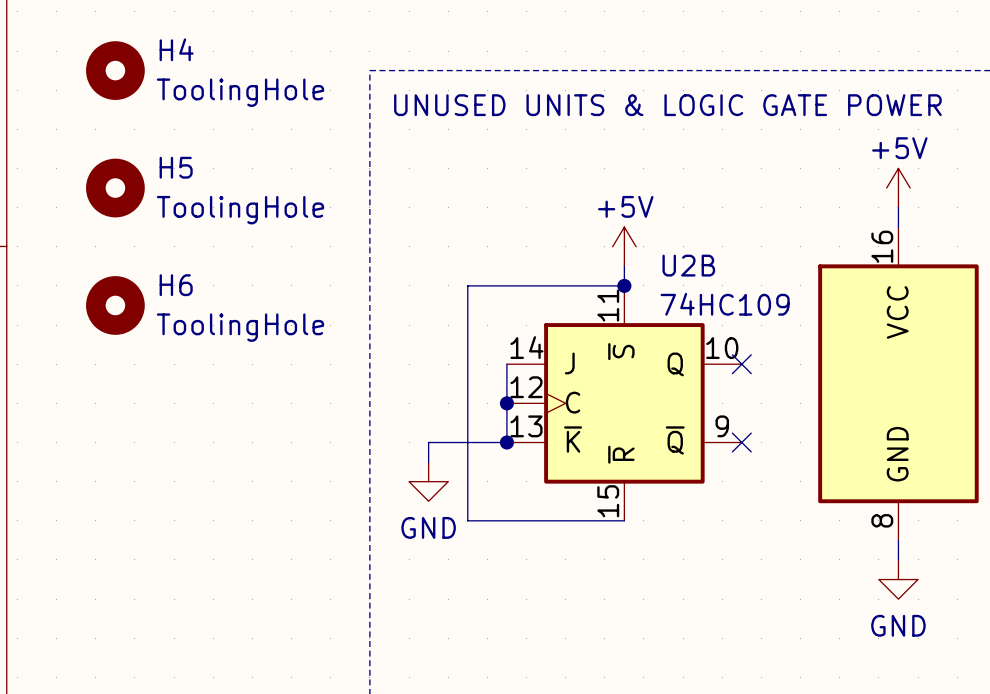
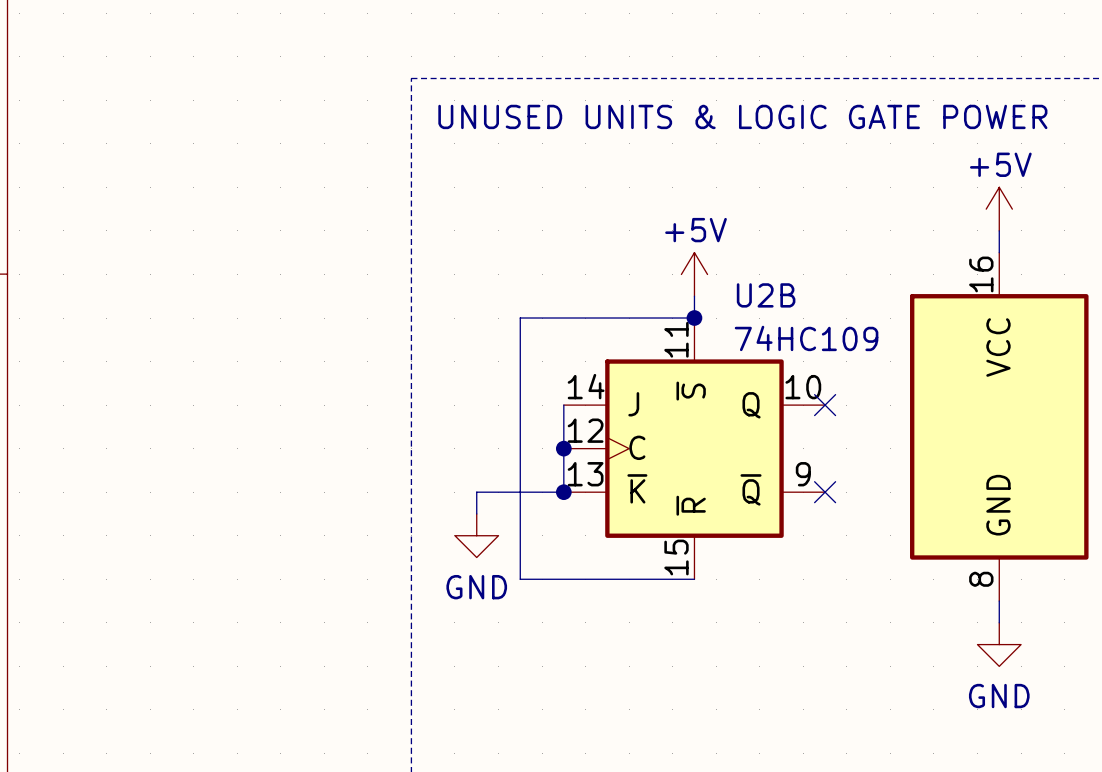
H4: ToolingHole (115, 70) -> none
H5: ToolingHole (115, 188) -> none
H6: ToolingHole (115, 305) -> none

